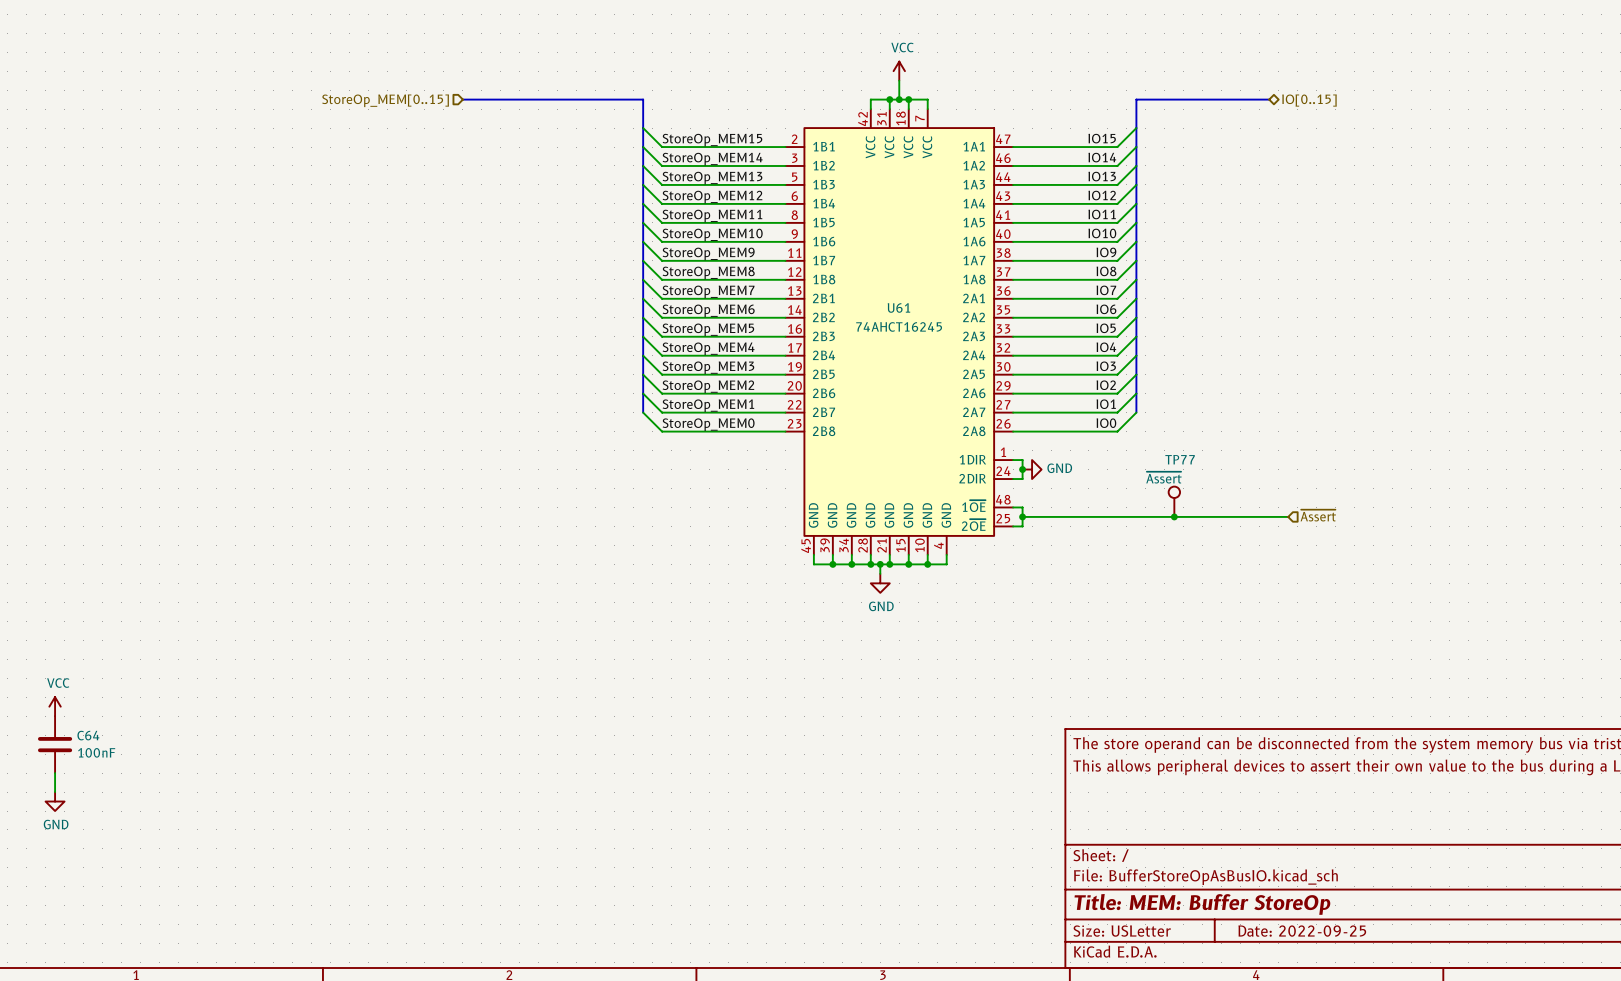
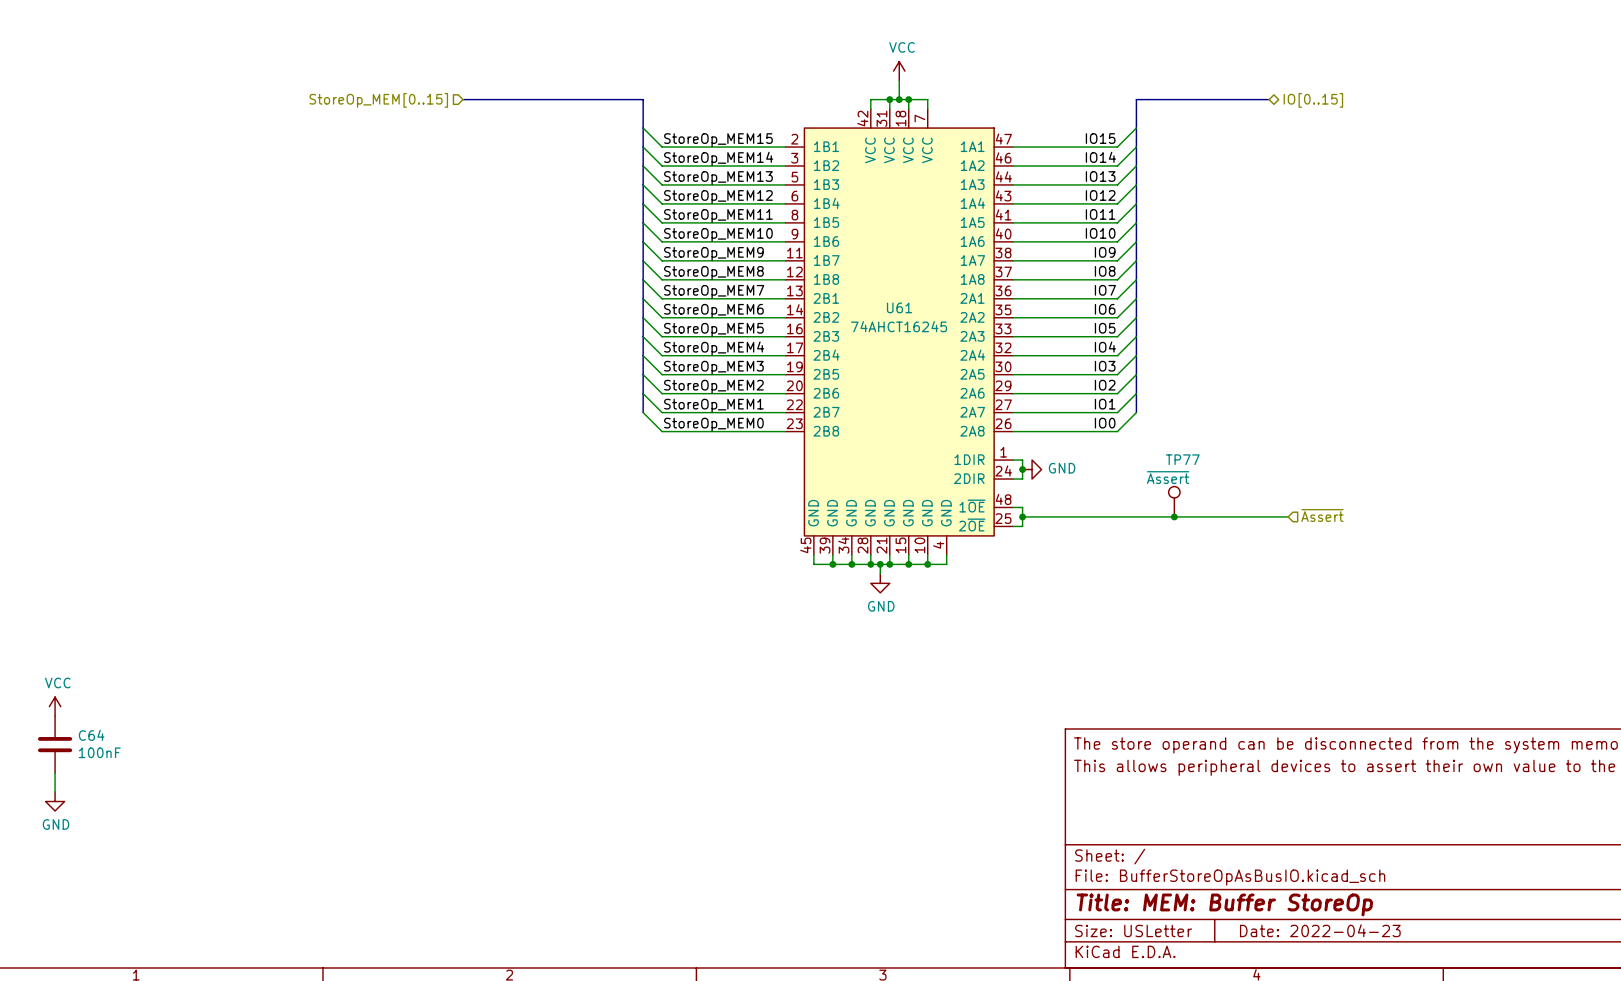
title block: Date: 2022-09-25 (1302, 931) -> Date: 2022-04-23 (1320, 930)

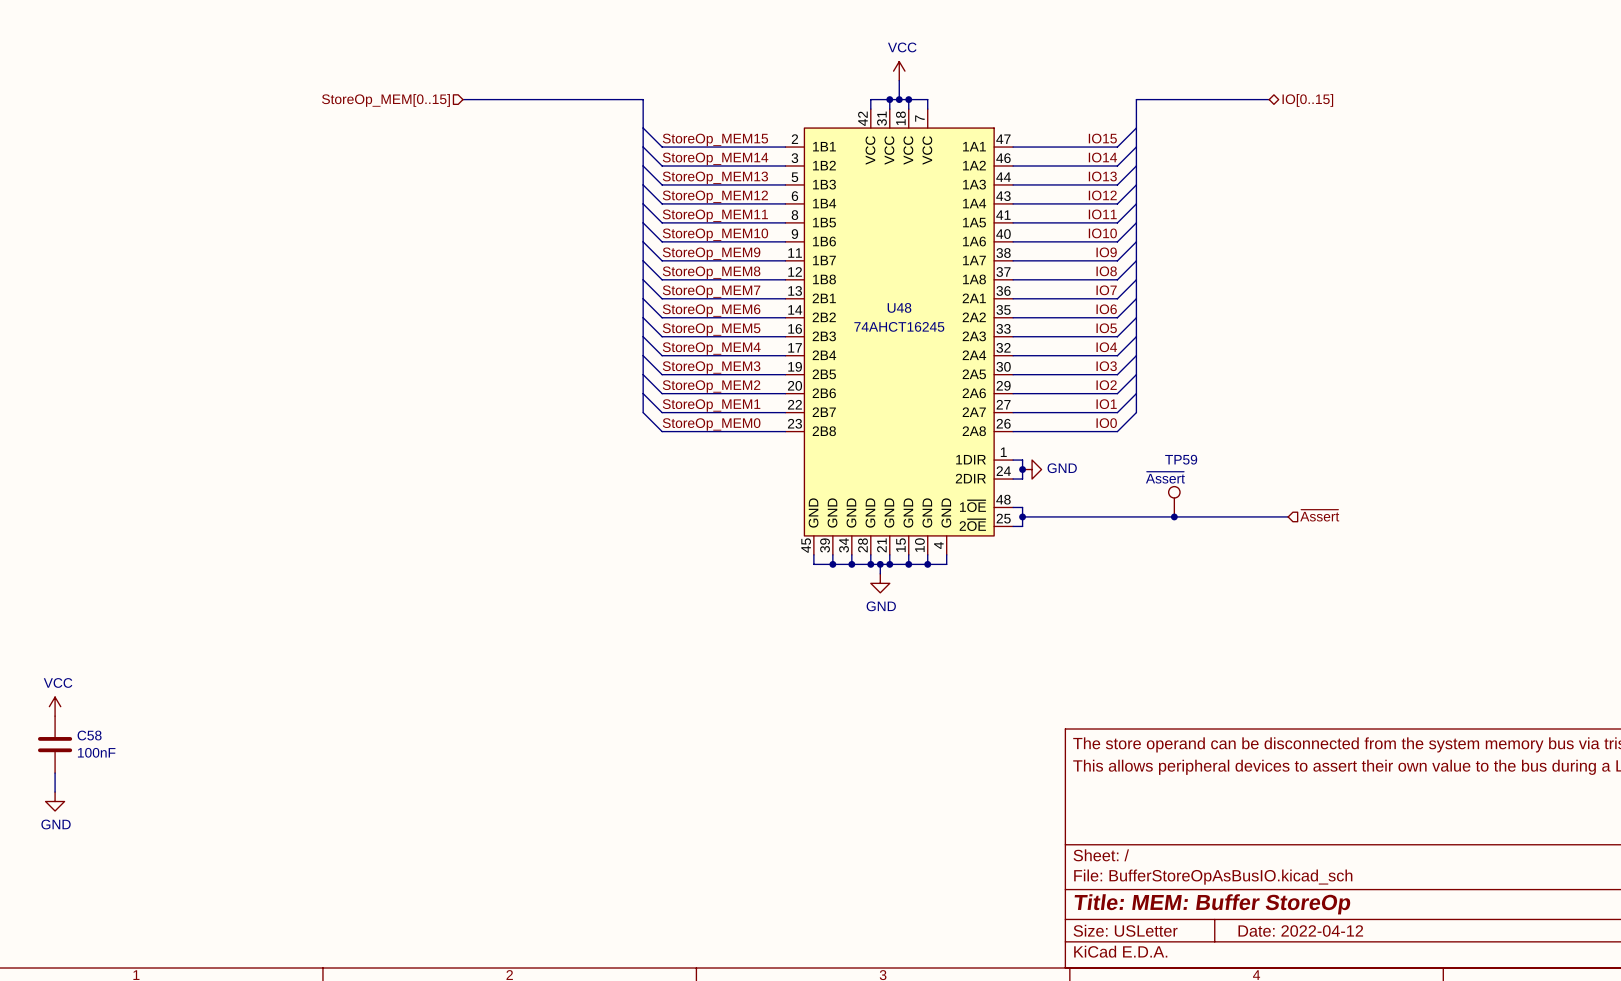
U61 name: U61 (899, 307) -> U48 (899, 307)
TP77 name: TP77 (1182, 459) -> TP59 (1181, 459)
C64 name: C64 (91, 735) -> C58 (89, 735)
title block: Date: 2022-04-23 (1320, 930) -> Date: 2022-04-12 (1300, 930)

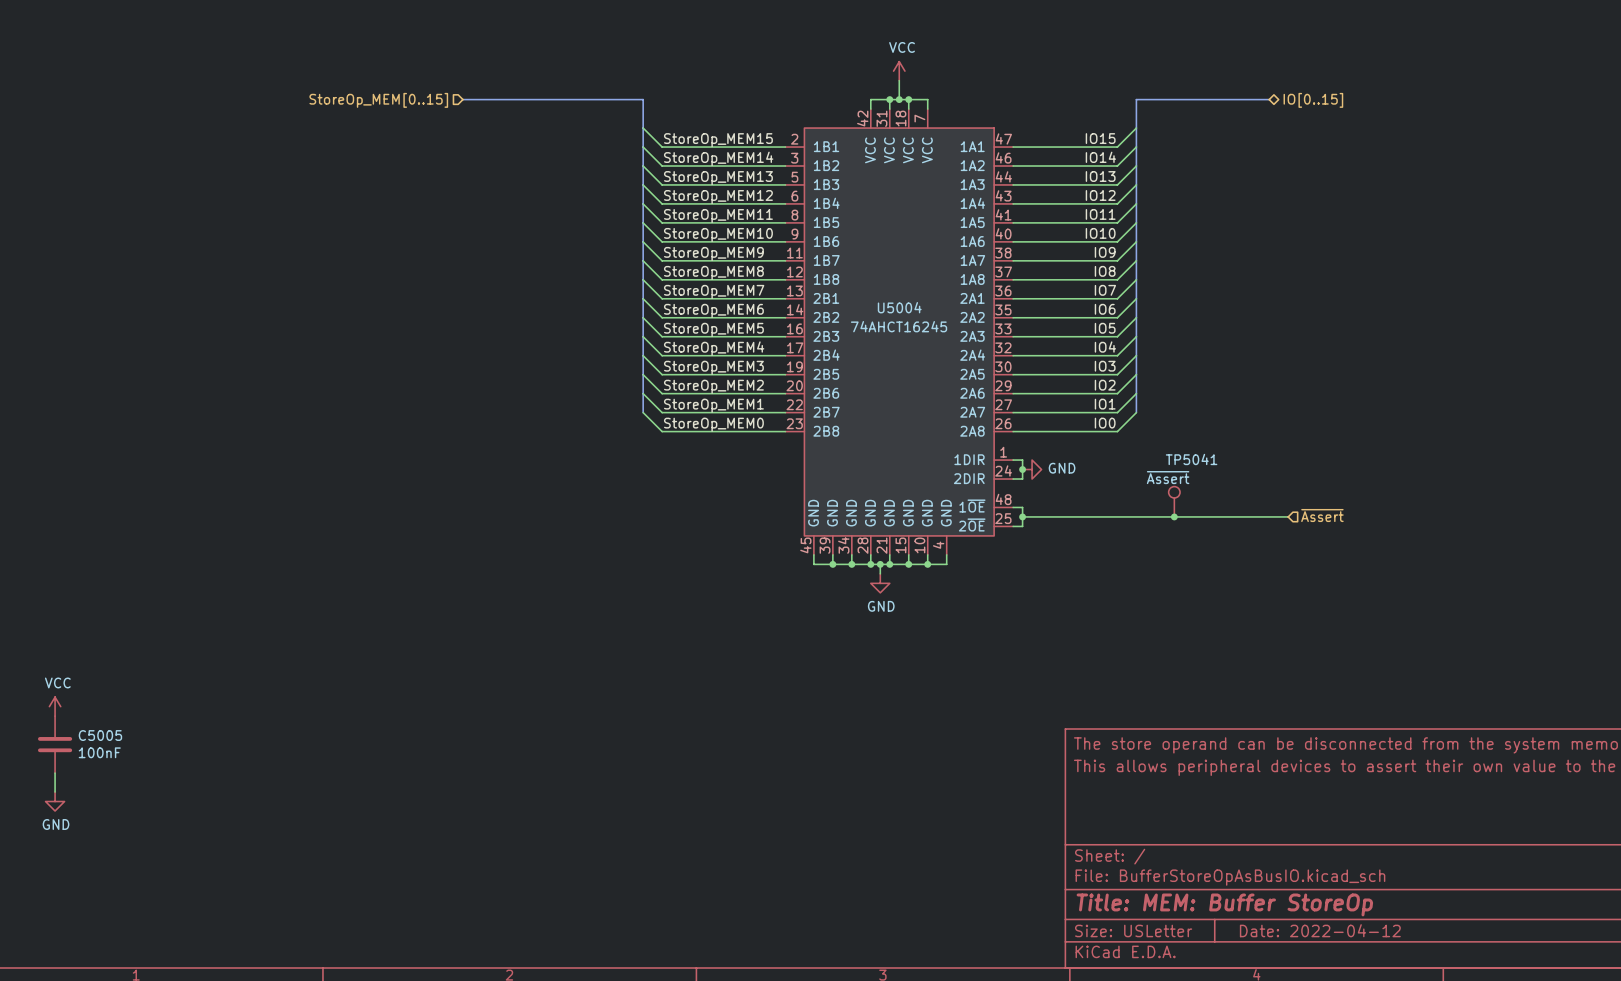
U48 name: U48 (899, 307) -> U5004 (899, 307)
TP59 name: TP59 (1181, 459) -> TP5041 (1191, 459)
C58 name: C58 (89, 735) -> C5005 (100, 735)

